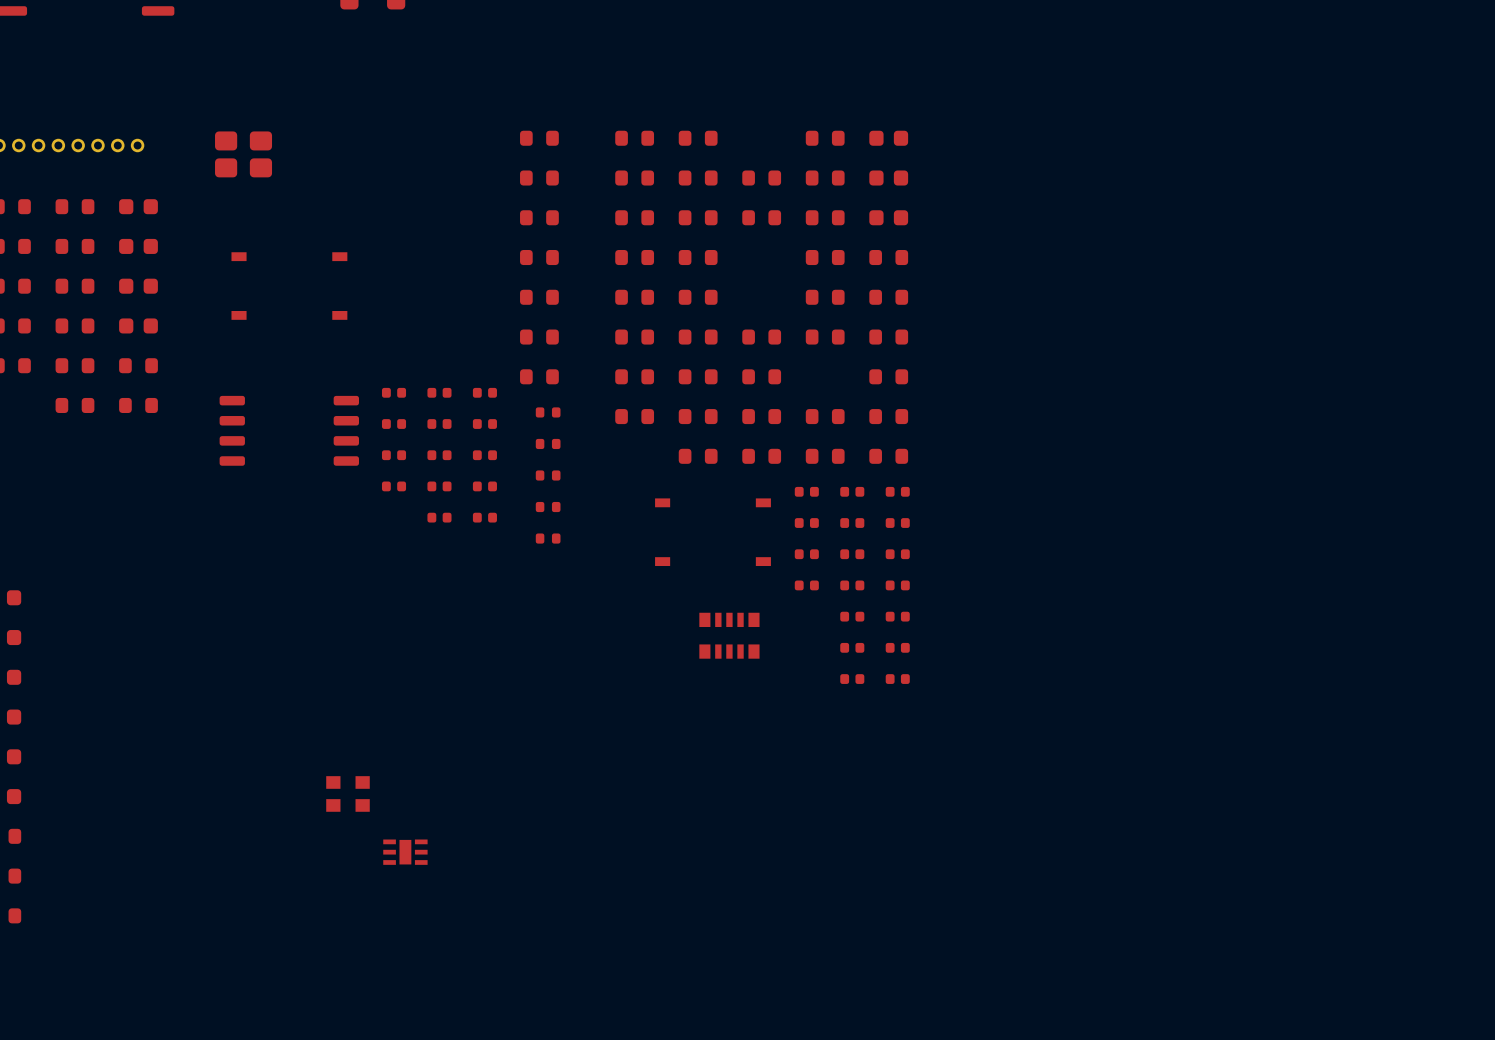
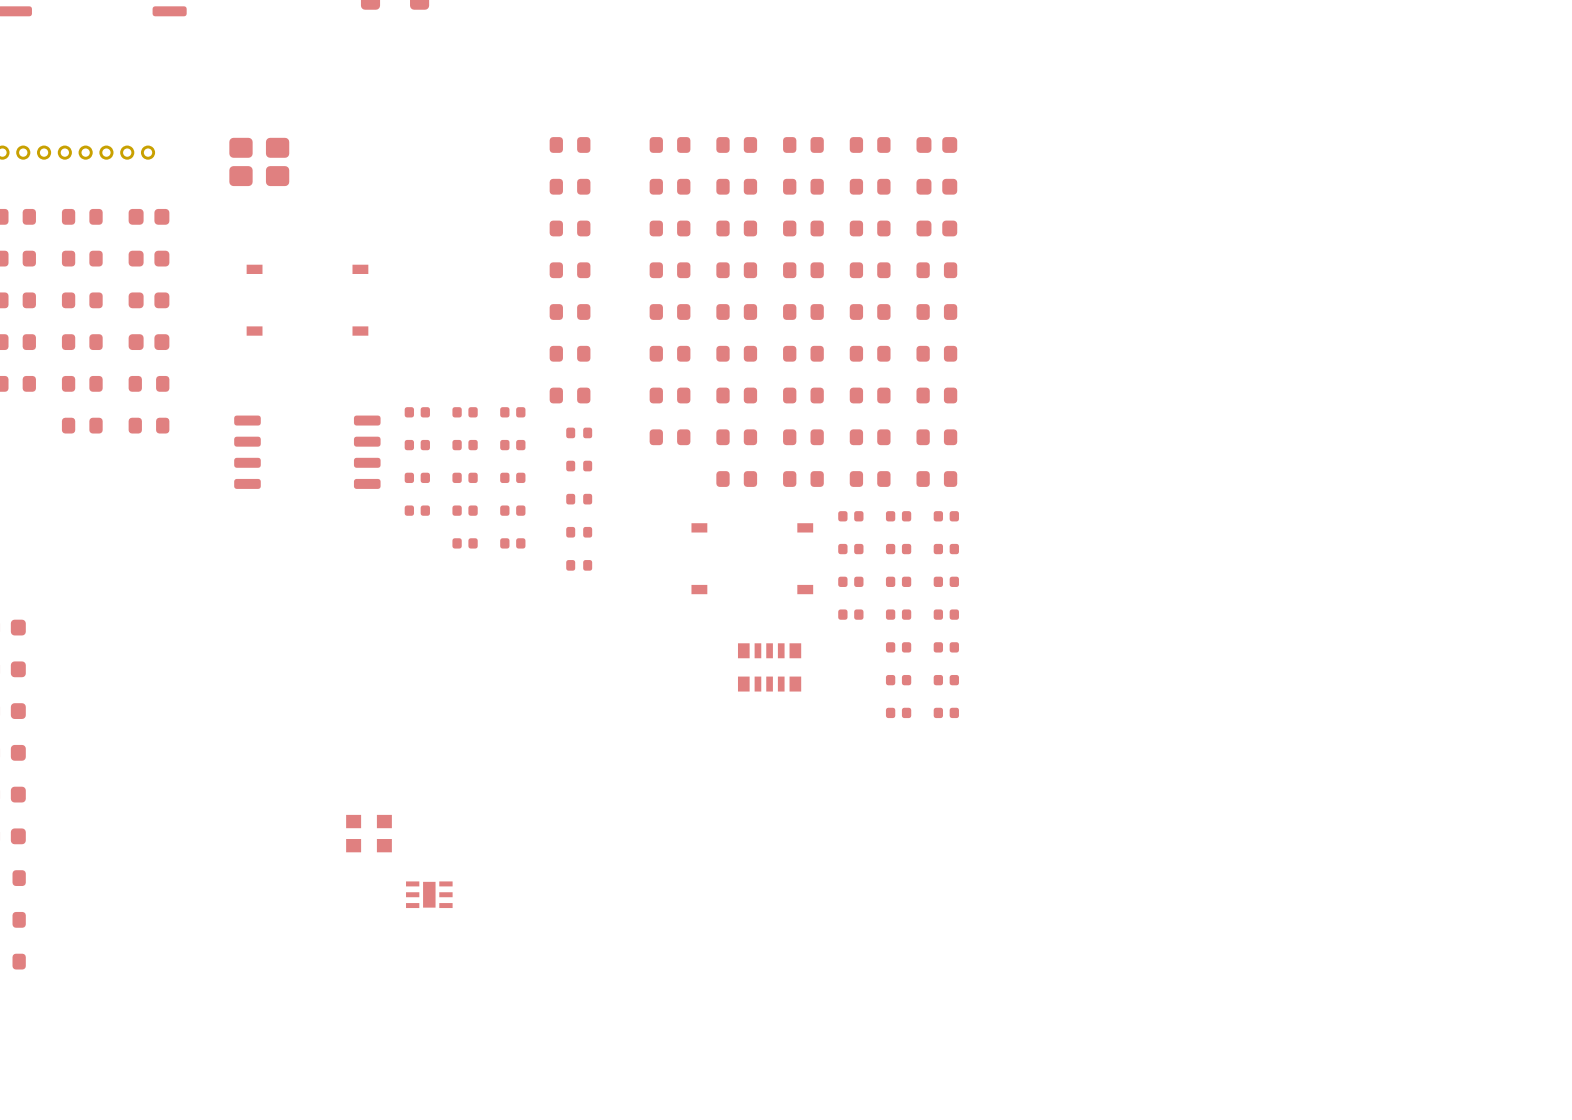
part: none -> (803, 144)
part: none -> (803, 270)
part: none -> (803, 312)
part: none -> (870, 395)

